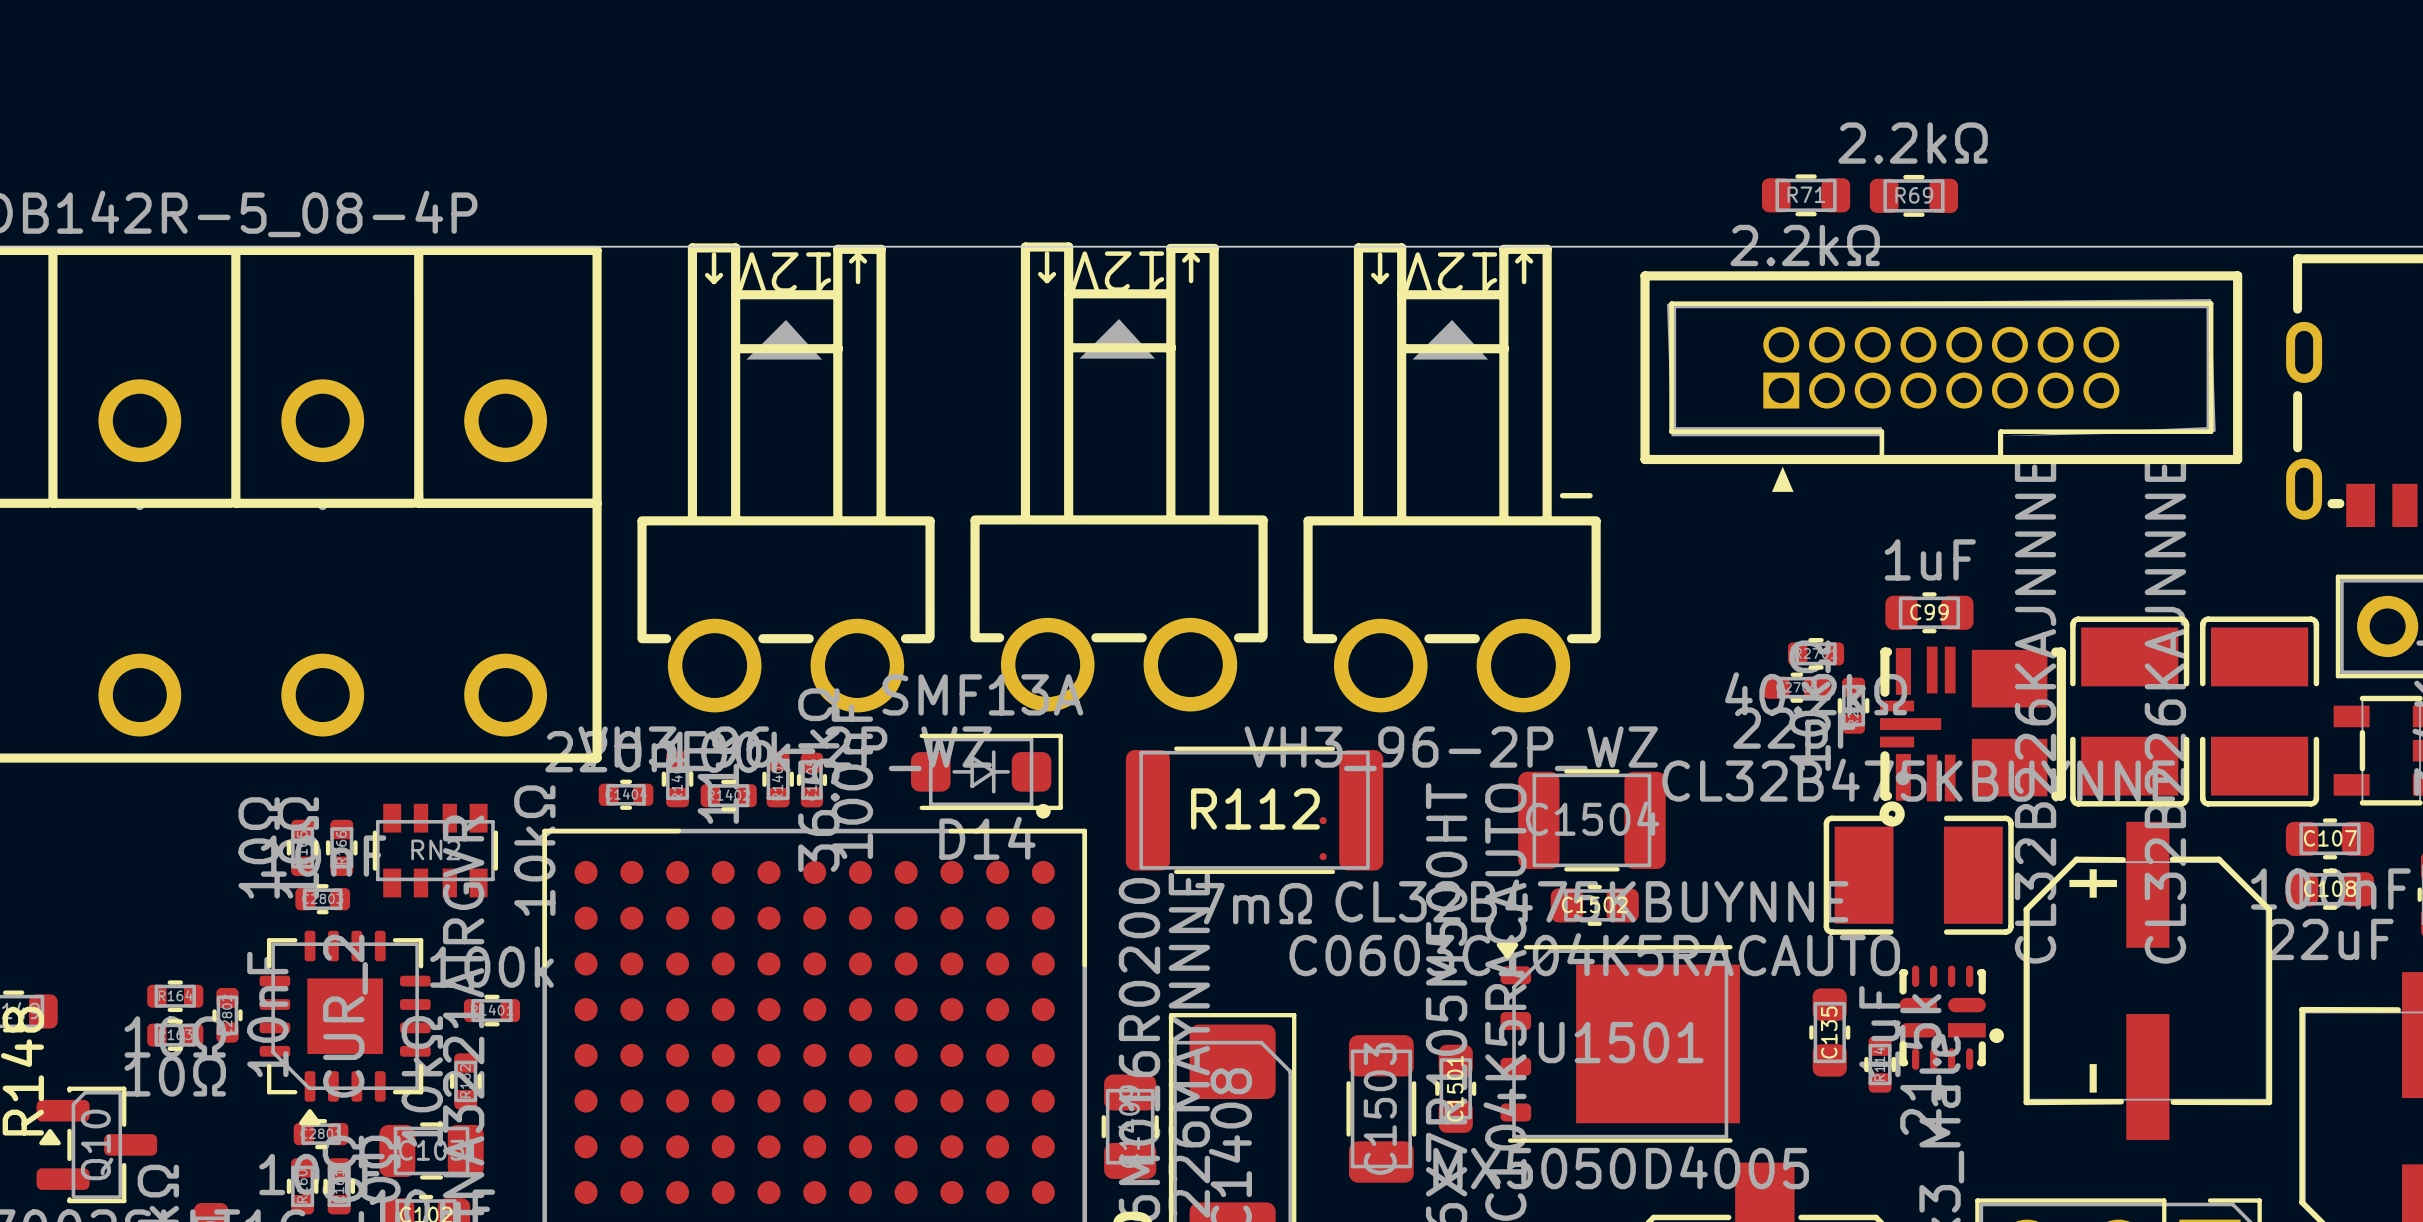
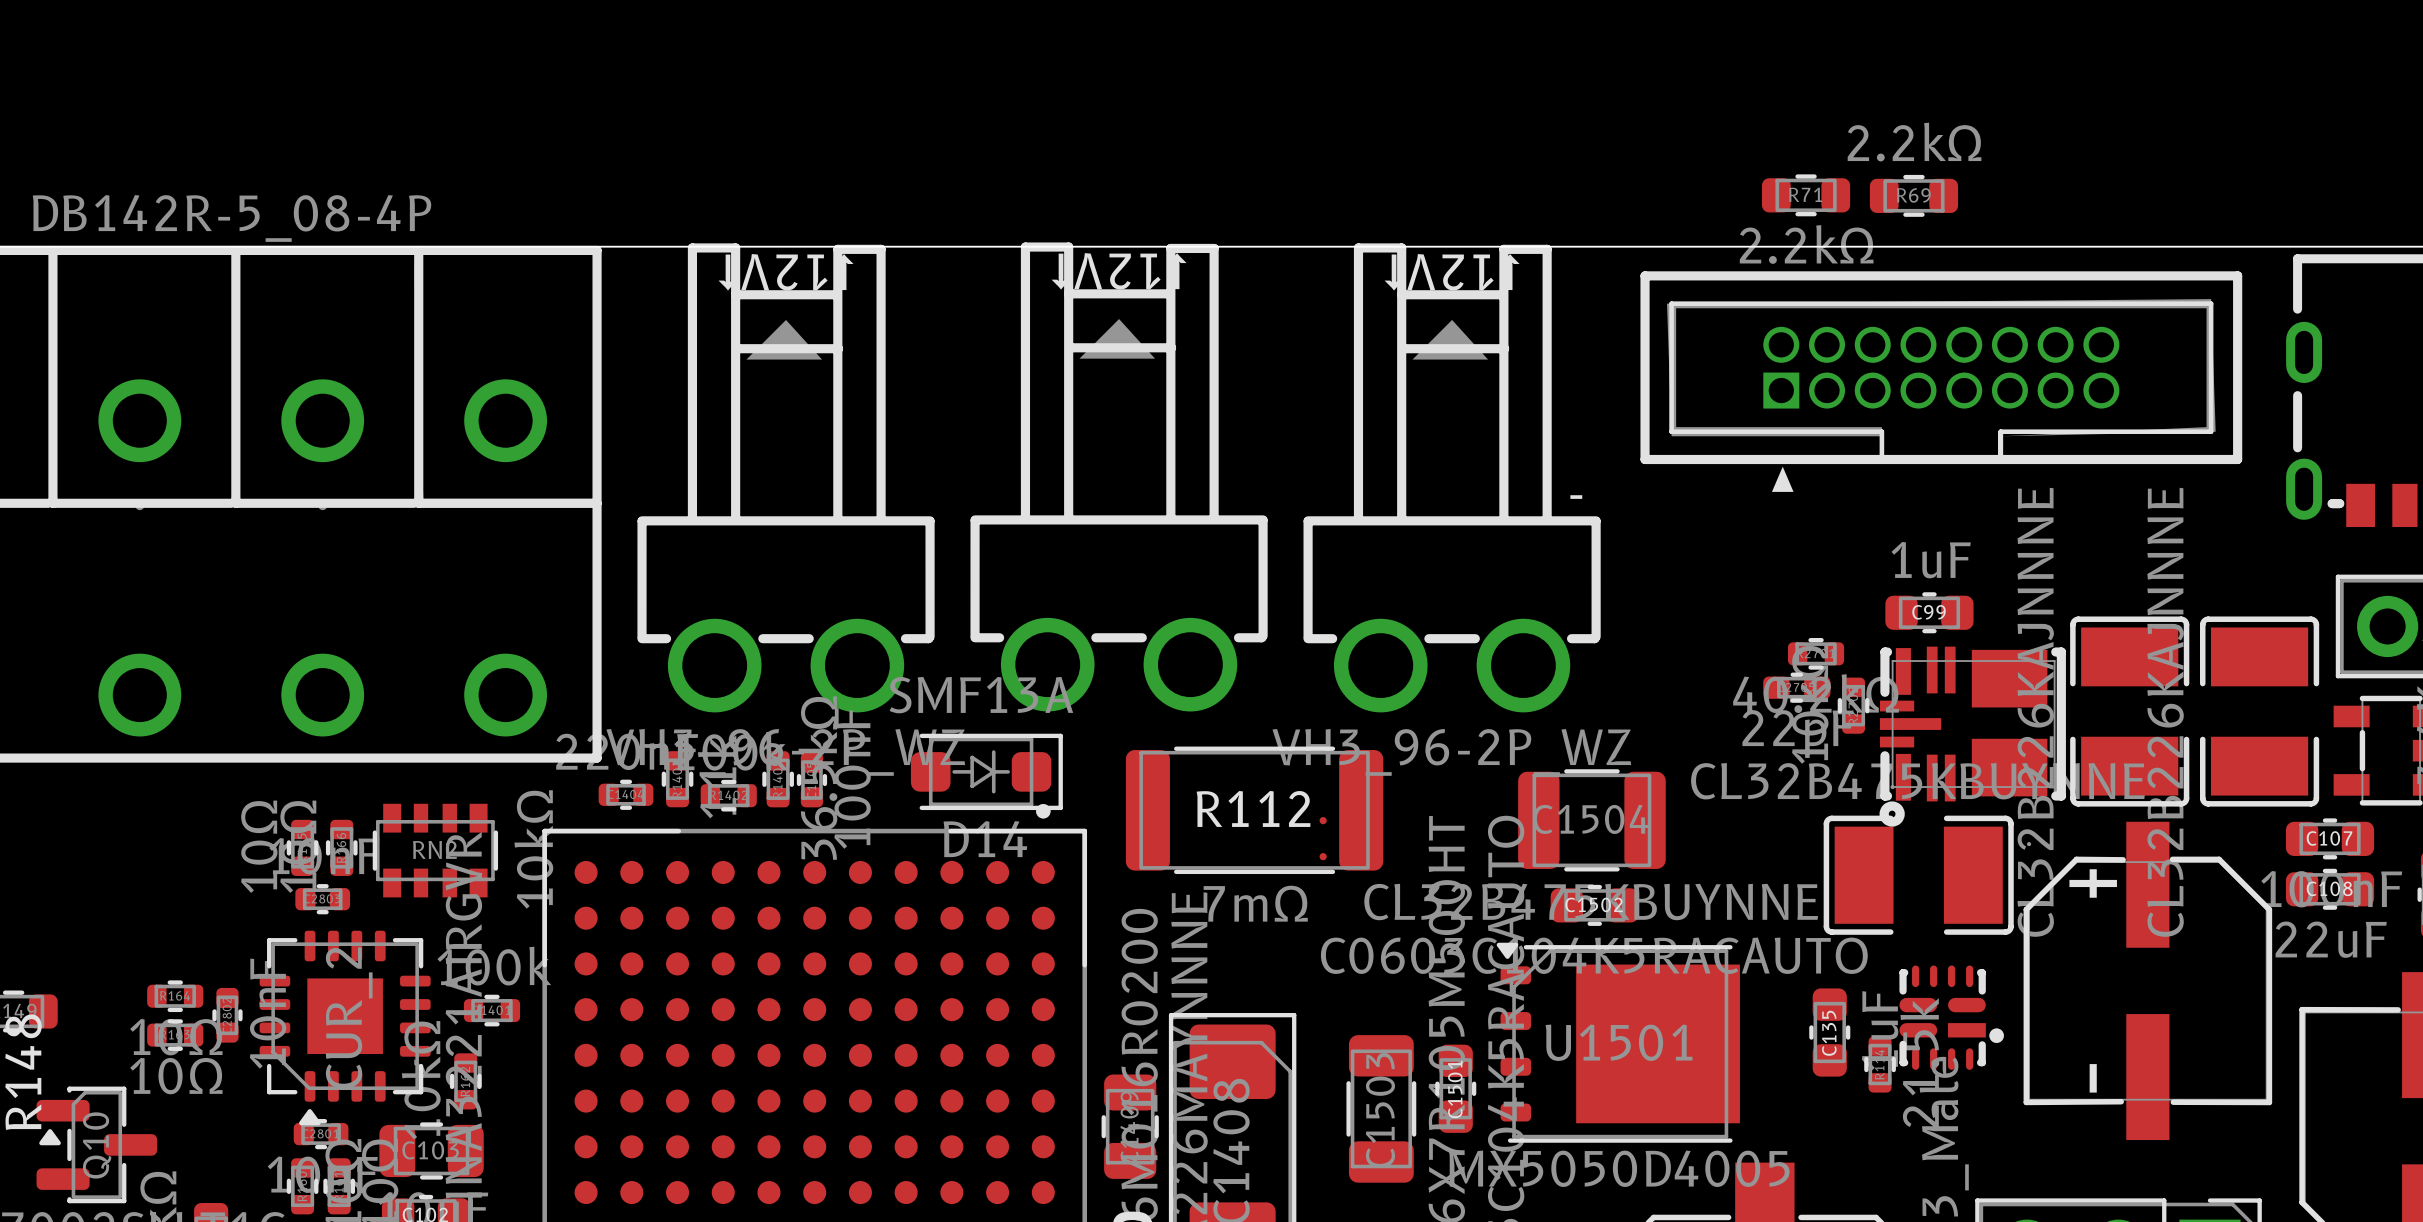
part footprint: [1879, 646, 2066, 827] -> [1879, 646, 2066, 827]

